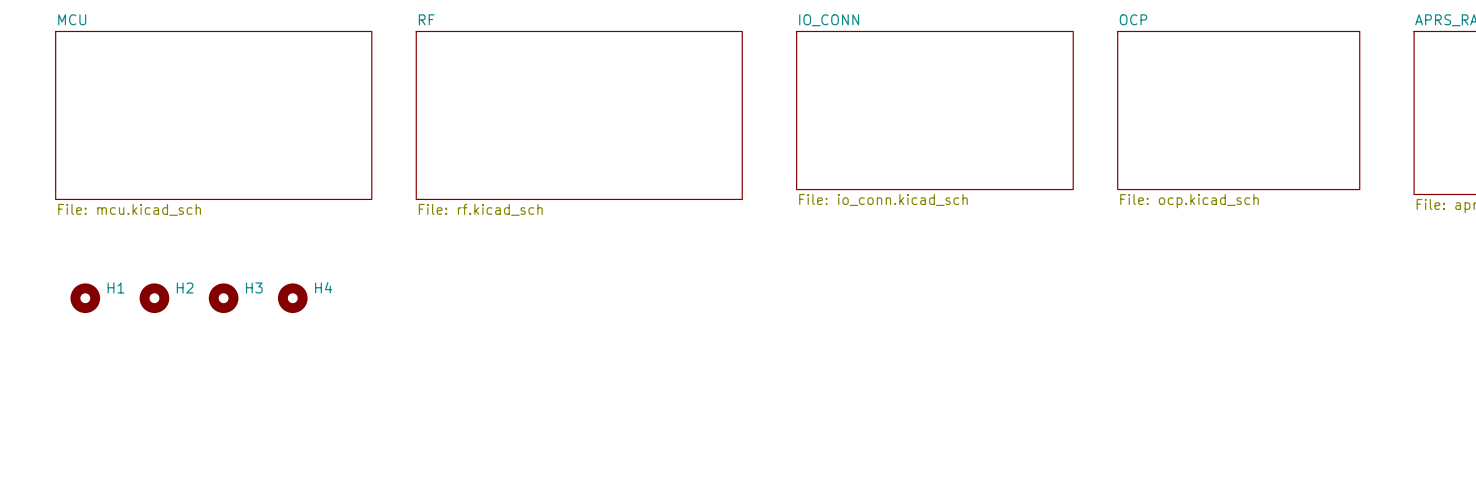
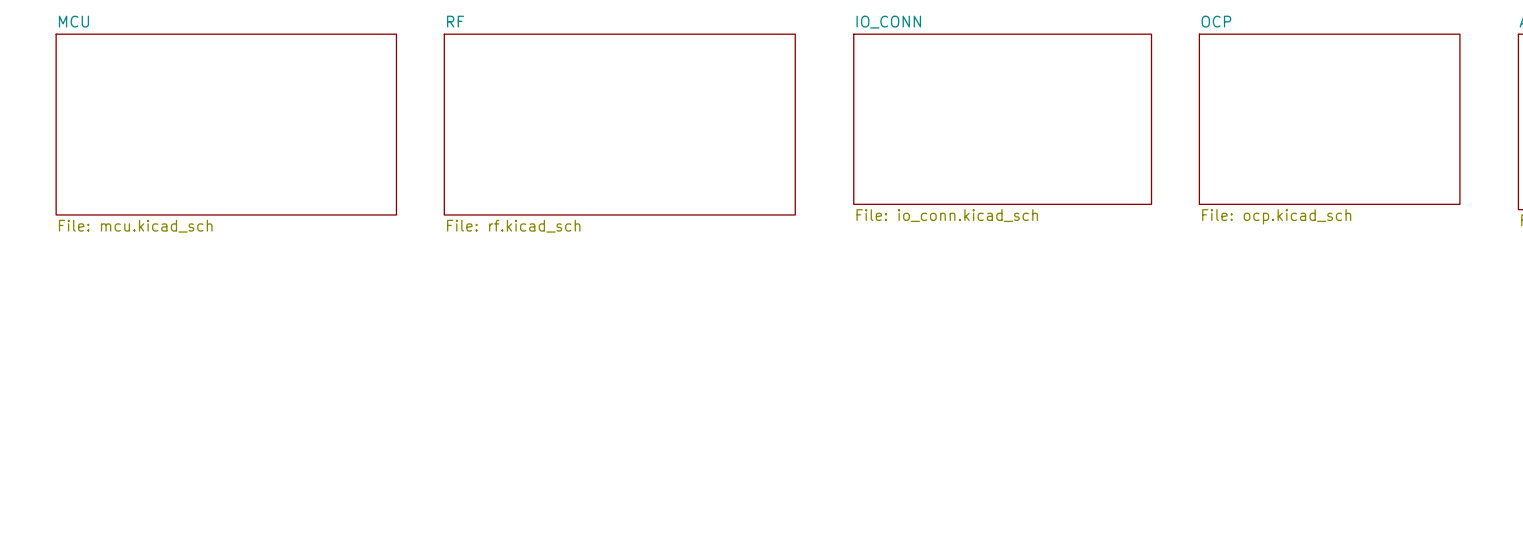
H1: (85, 298) -> none
H2: (154, 298) -> none
H3: (223, 298) -> none
H4: (292, 298) -> none

